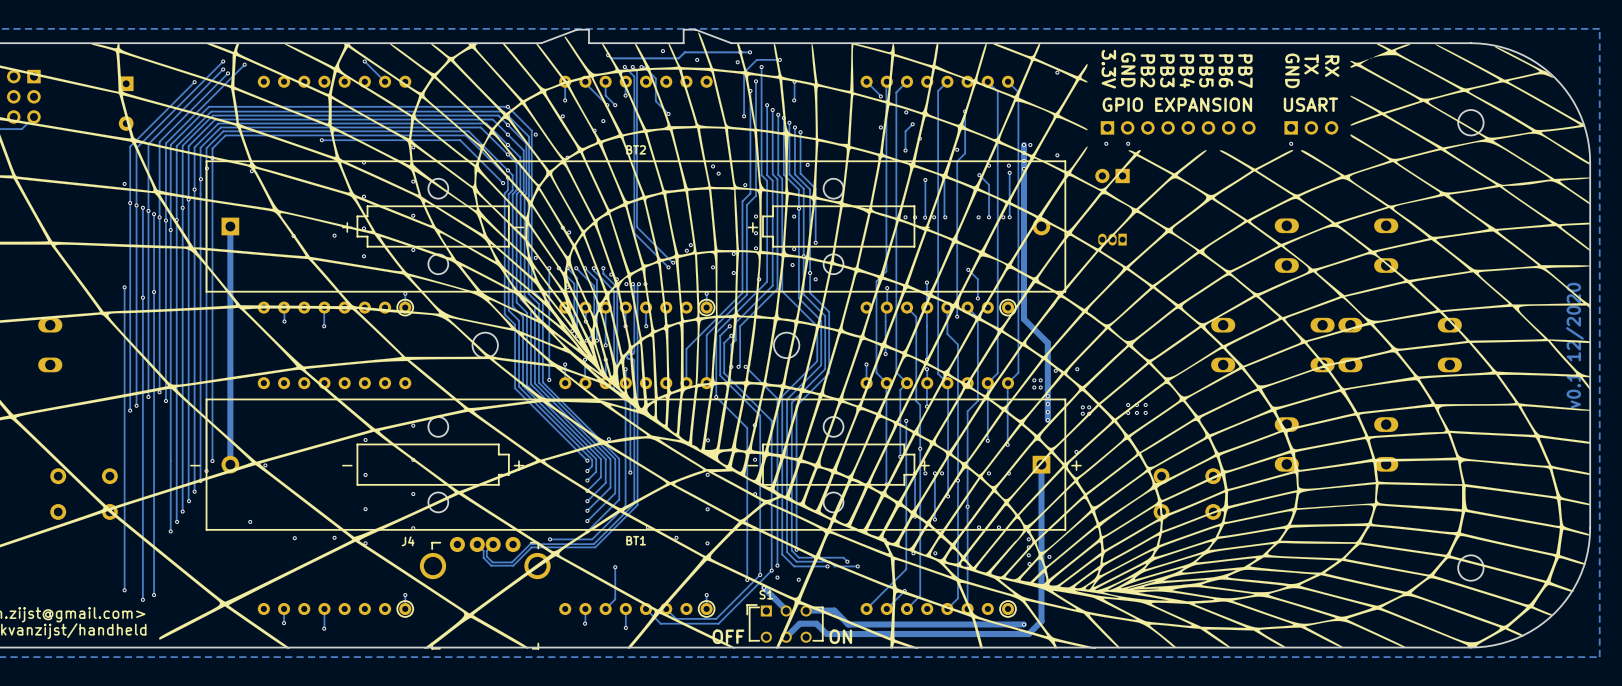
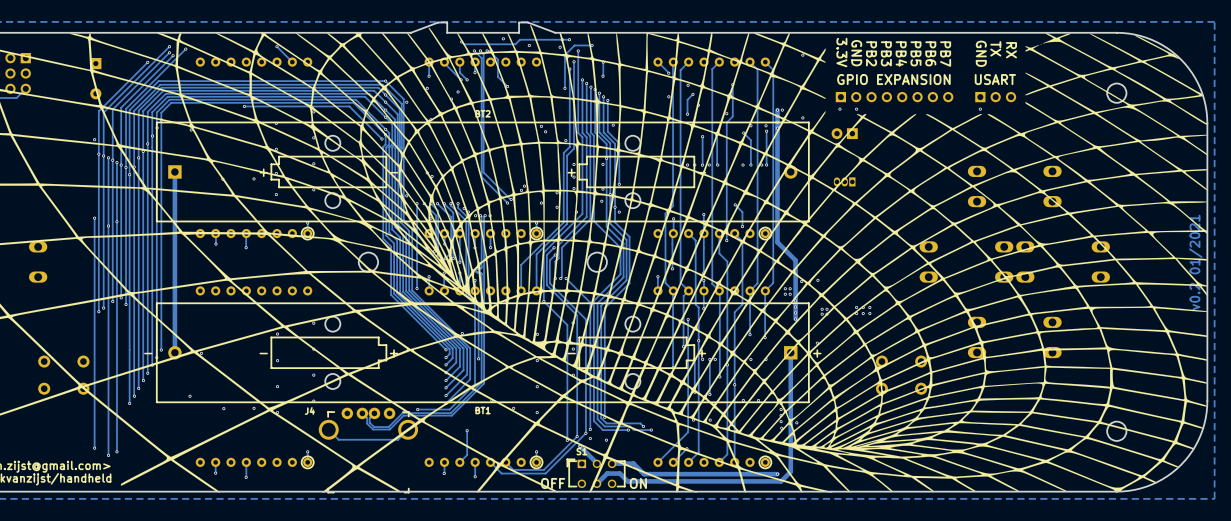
text: v0.1 12/2020 (1574, 345) -> v0.2 01/2021 (1195, 262)
track: none -> (408, 429) (398, 439) (338, 439) (328, 429)

